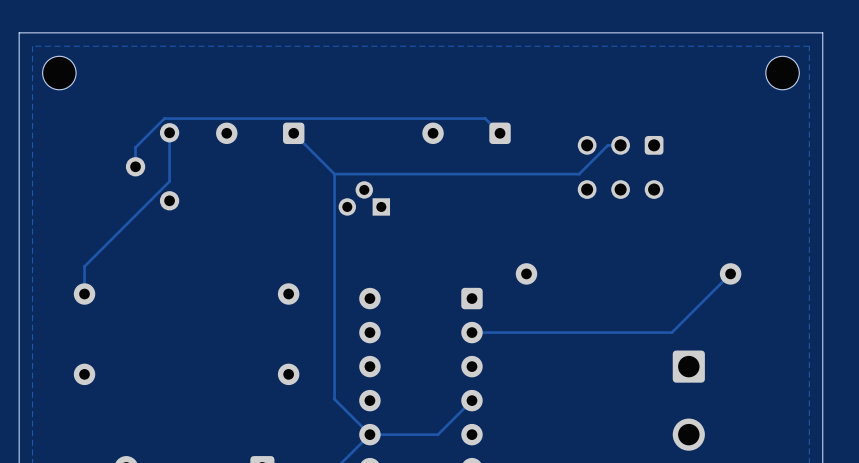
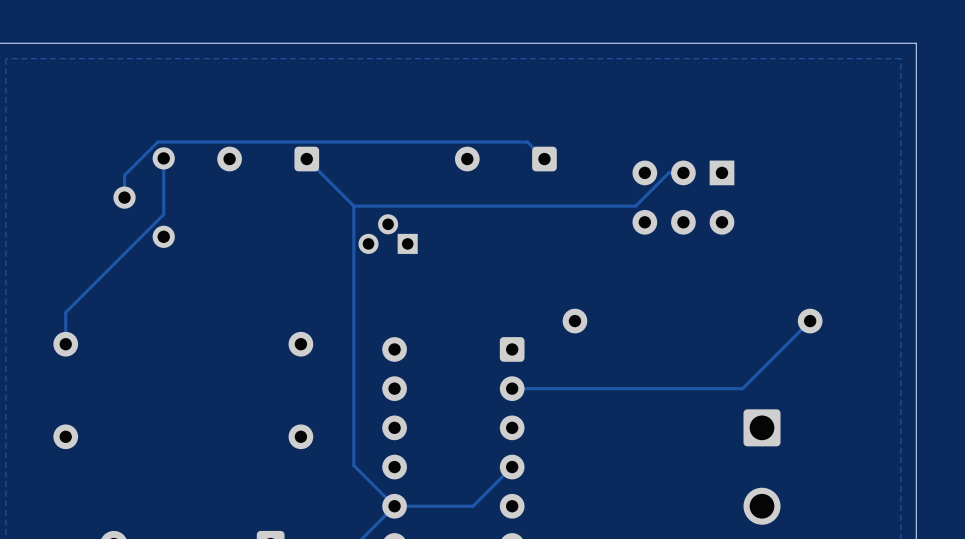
part: (59, 73) -> none
part: (782, 73) -> none
part footprint: [577, 135, 664, 199] -> [632, 160, 735, 235]

